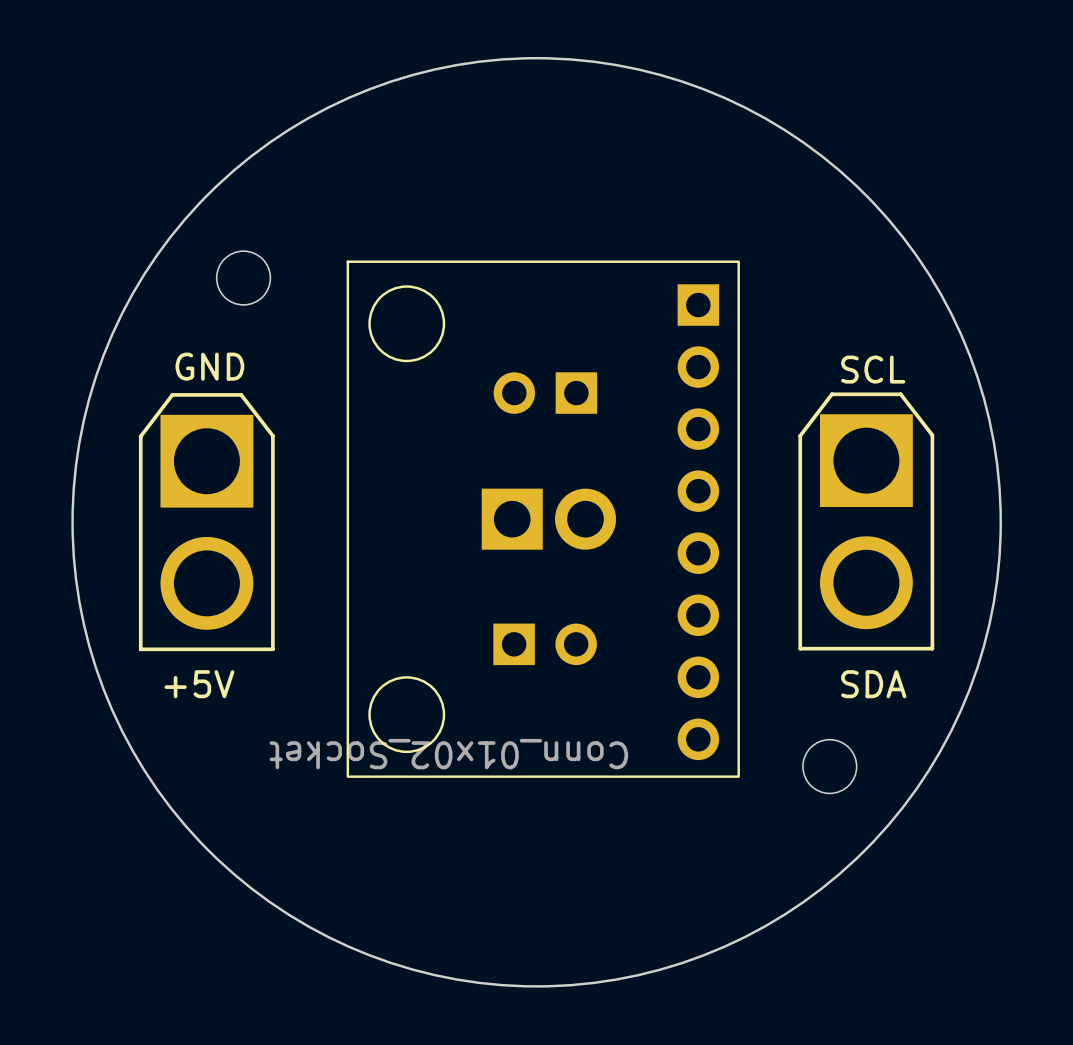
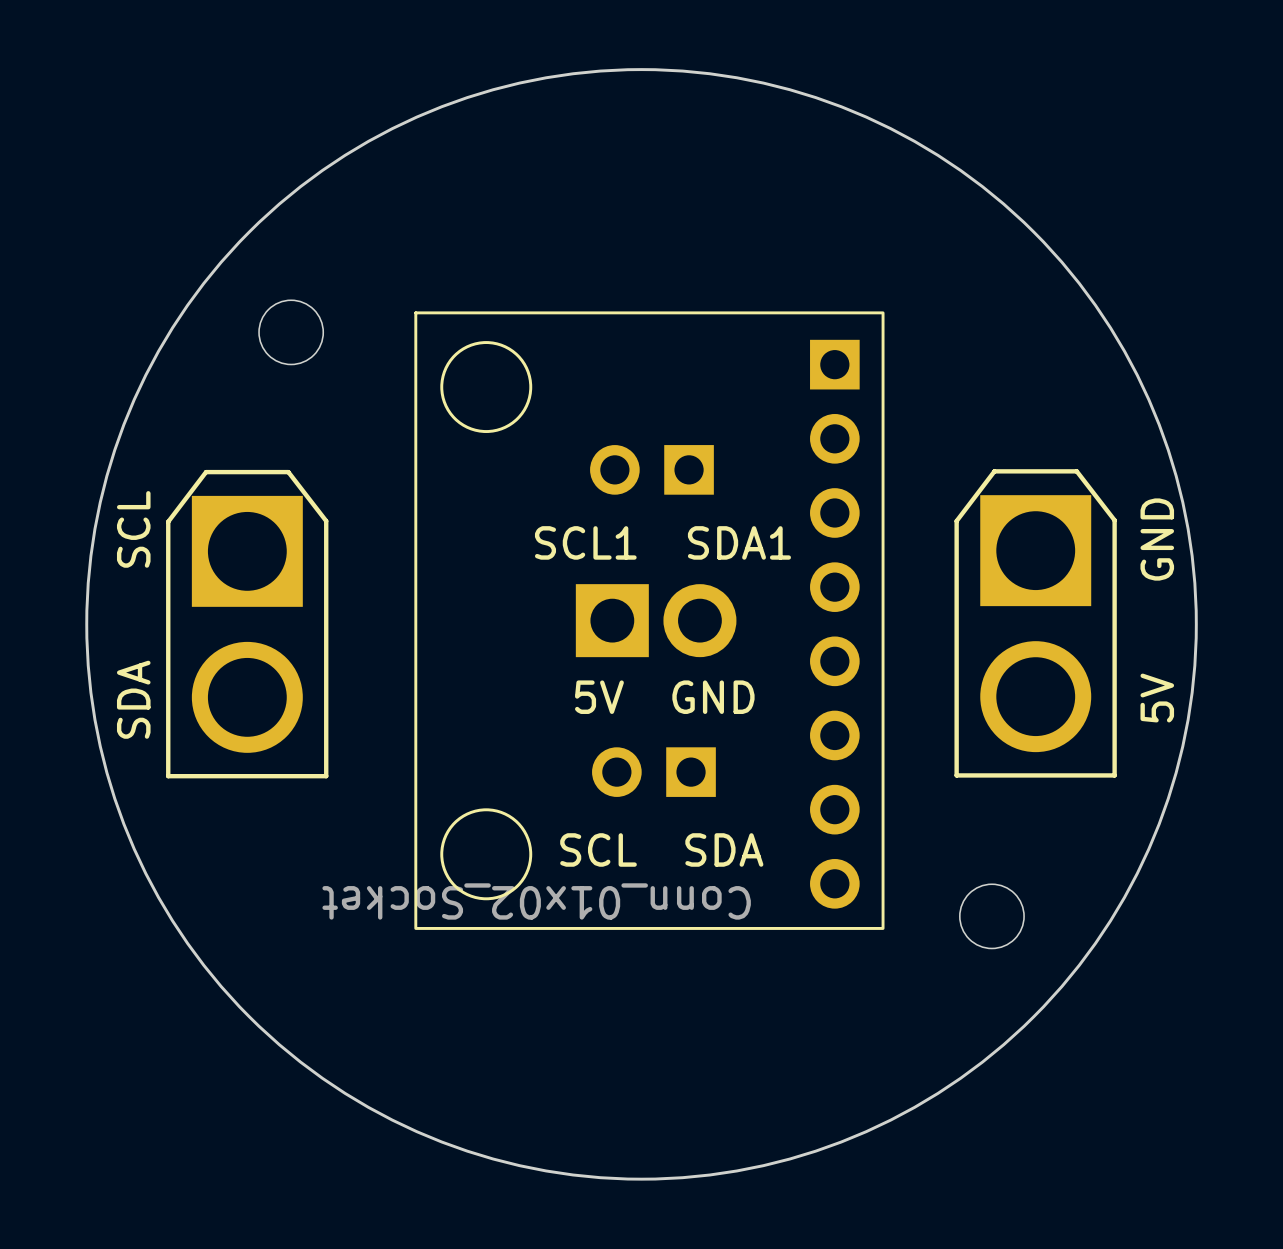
text: GND (209, 366) -> none
text: SCL (873, 369) -> none
text: none -> SCL1 SDA1 (662, 542)
text: none -> 5V GND (1157, 610)
text: none -> SDA SCL (133, 614)
text: none -> 5V GND (664, 697)
part rotation: 0° (545, 644) -> 180° (653, 772)
text: +5V (199, 684) -> none
text: SDA (873, 684) -> none
text: none -> SCL SDA (661, 849)

